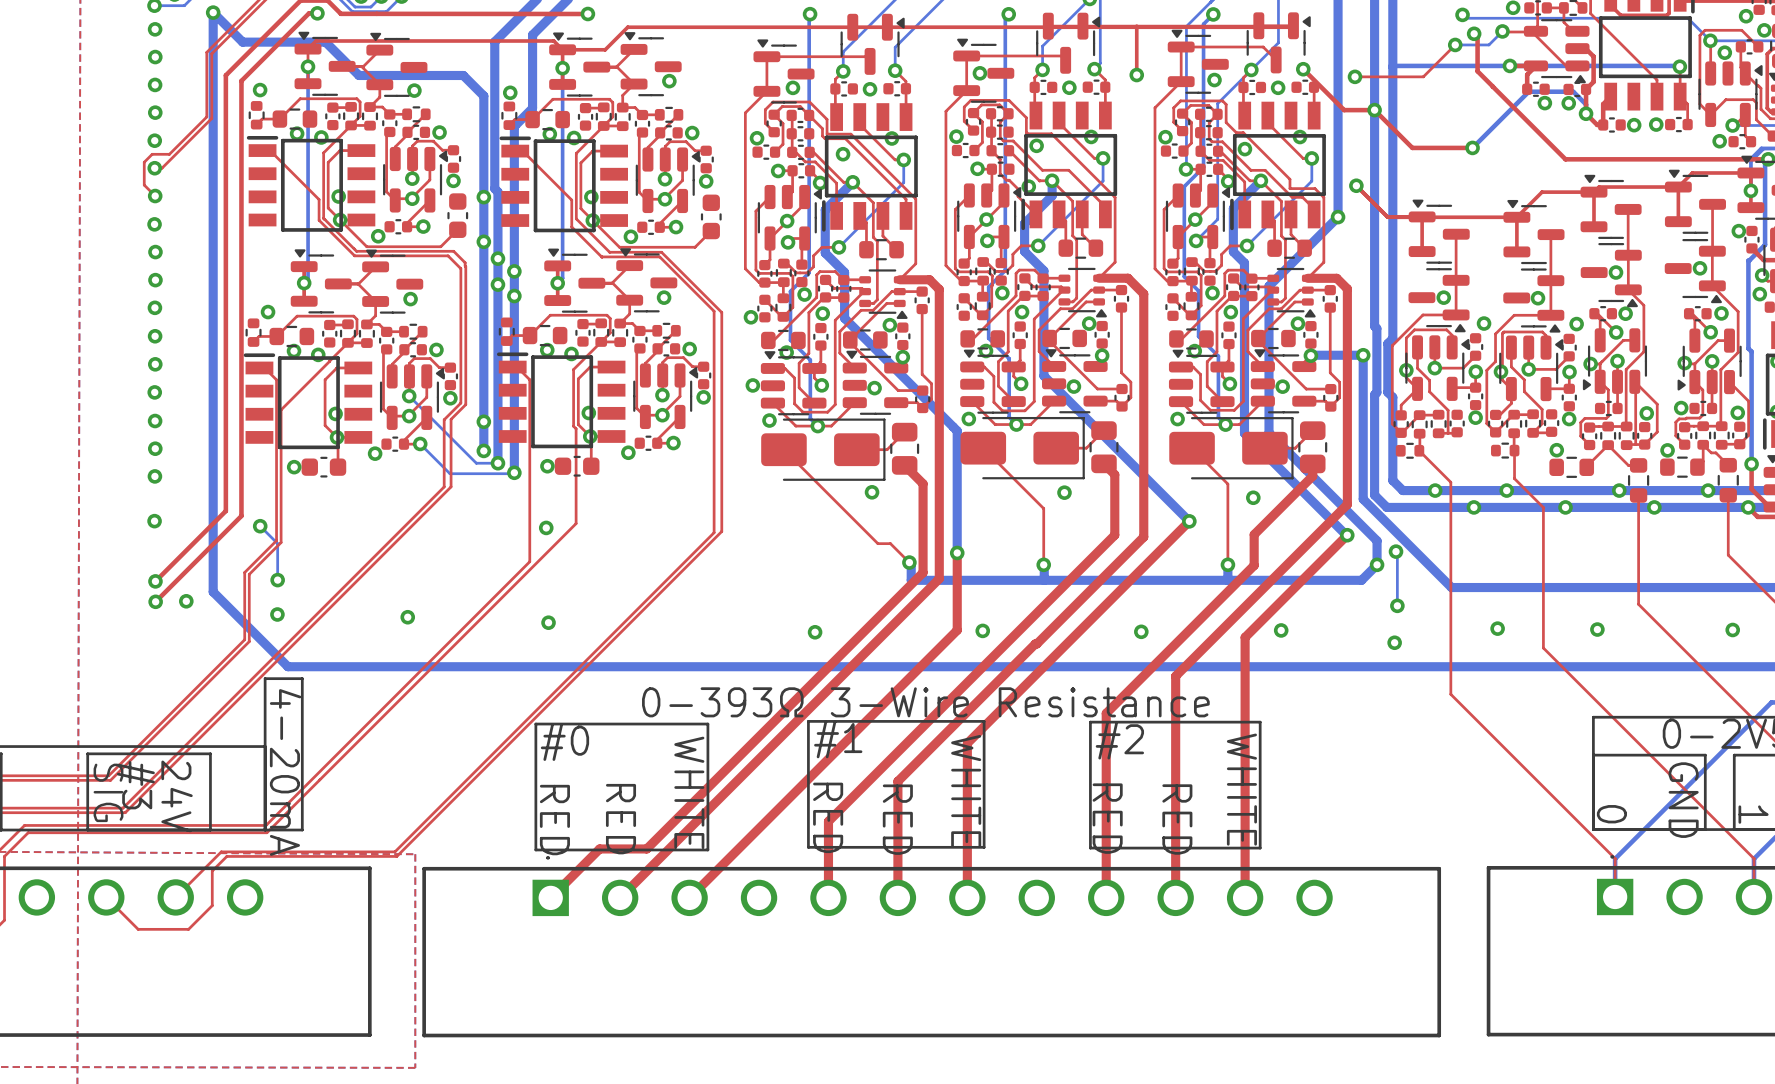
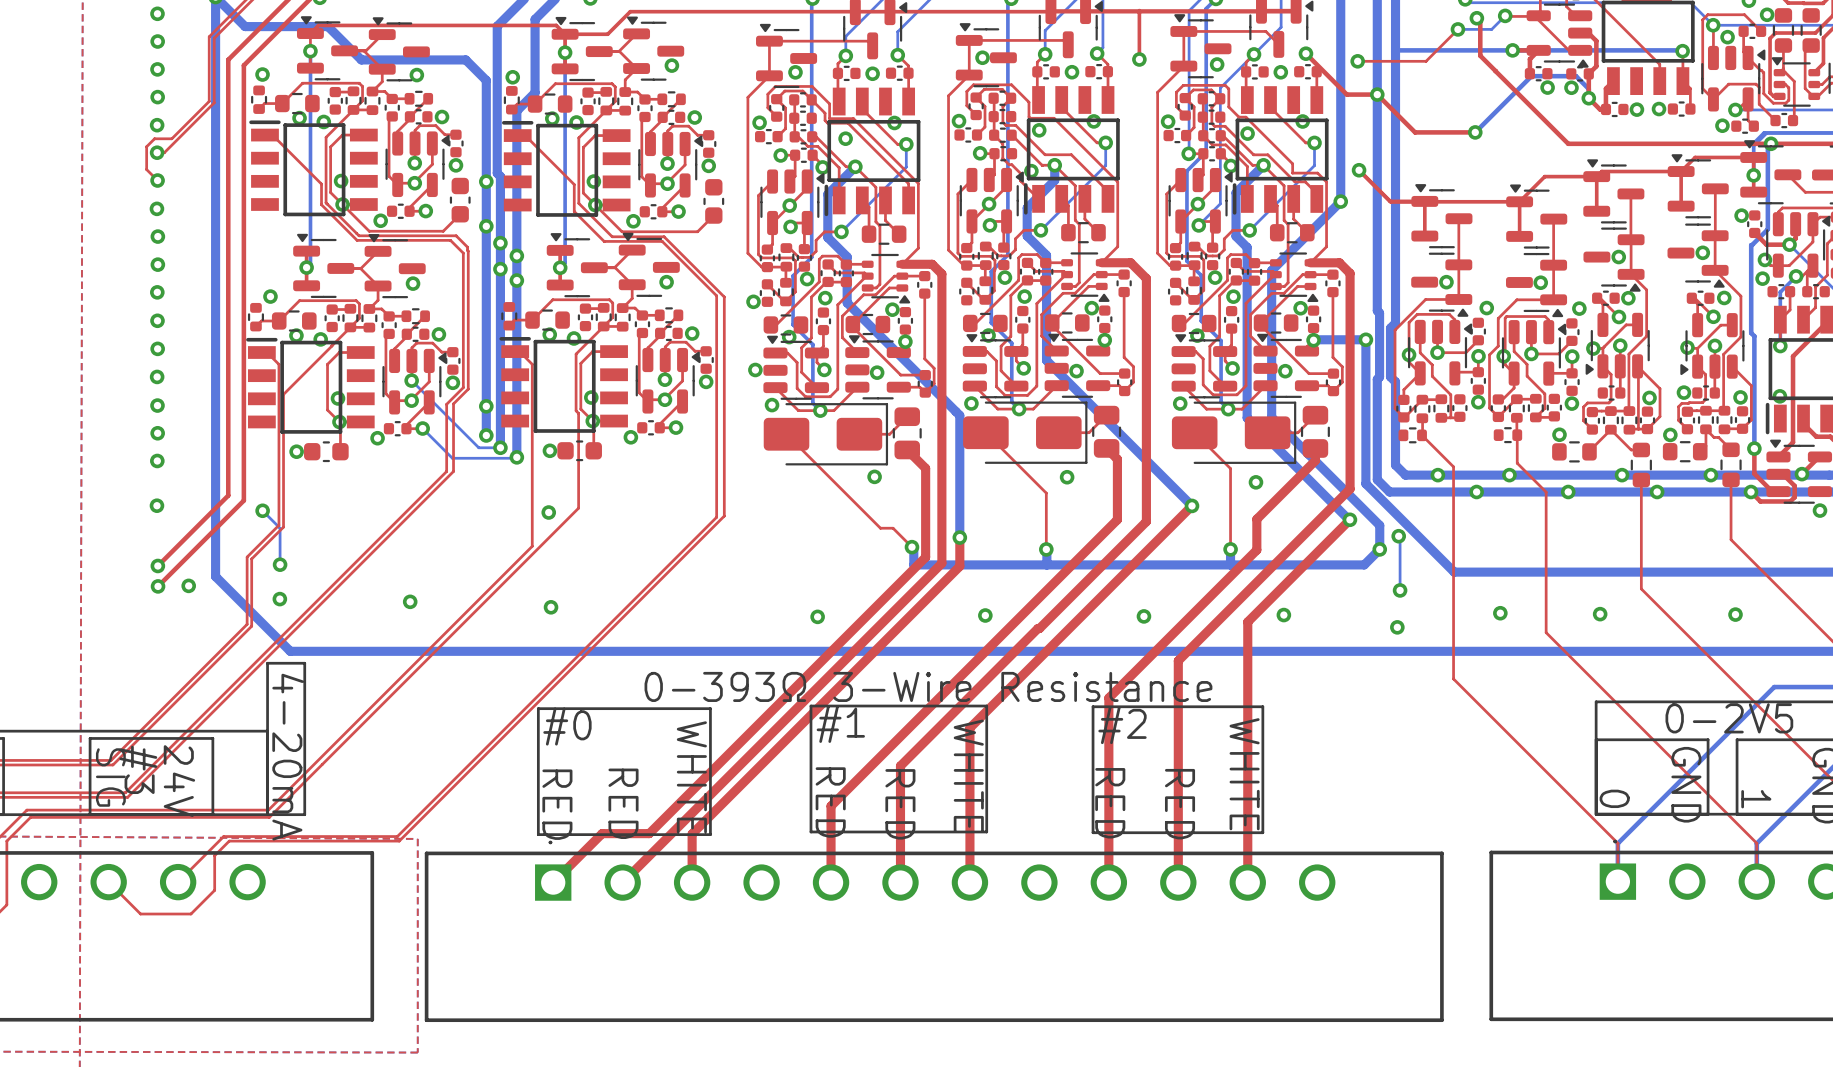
top track: (957, 581) (957, 630) (689, 897) -> (959, 566) (692, 833) (692, 882)

